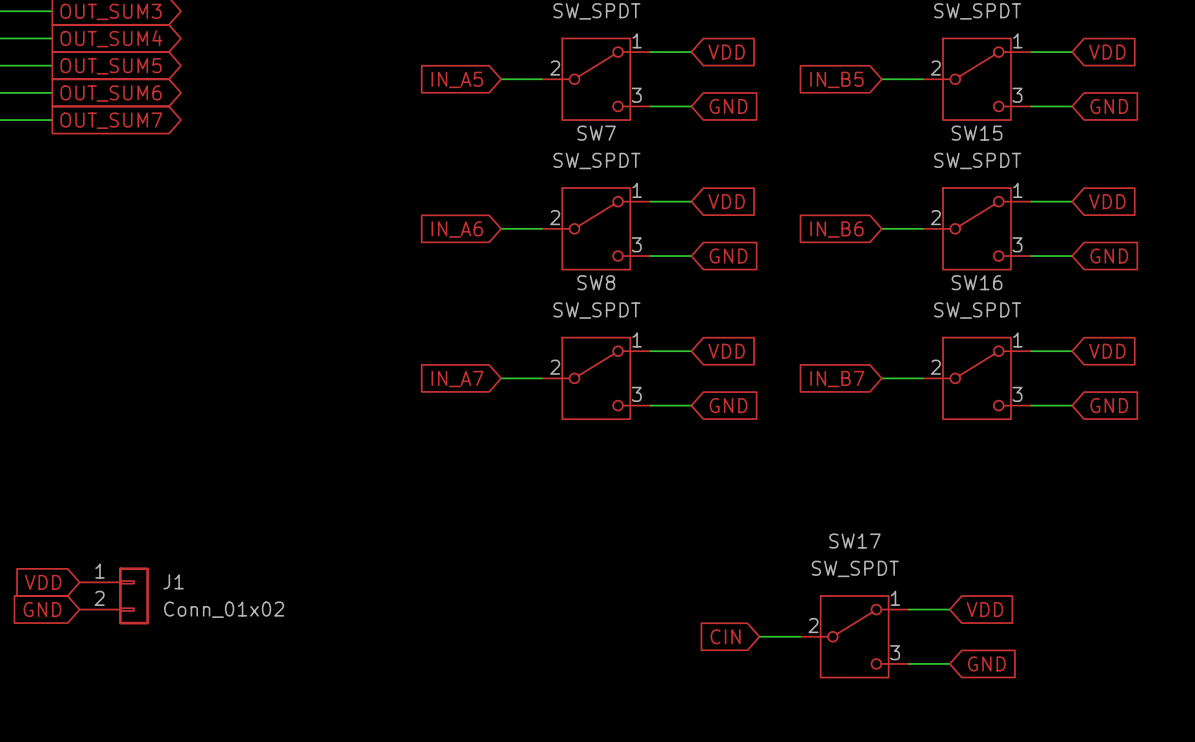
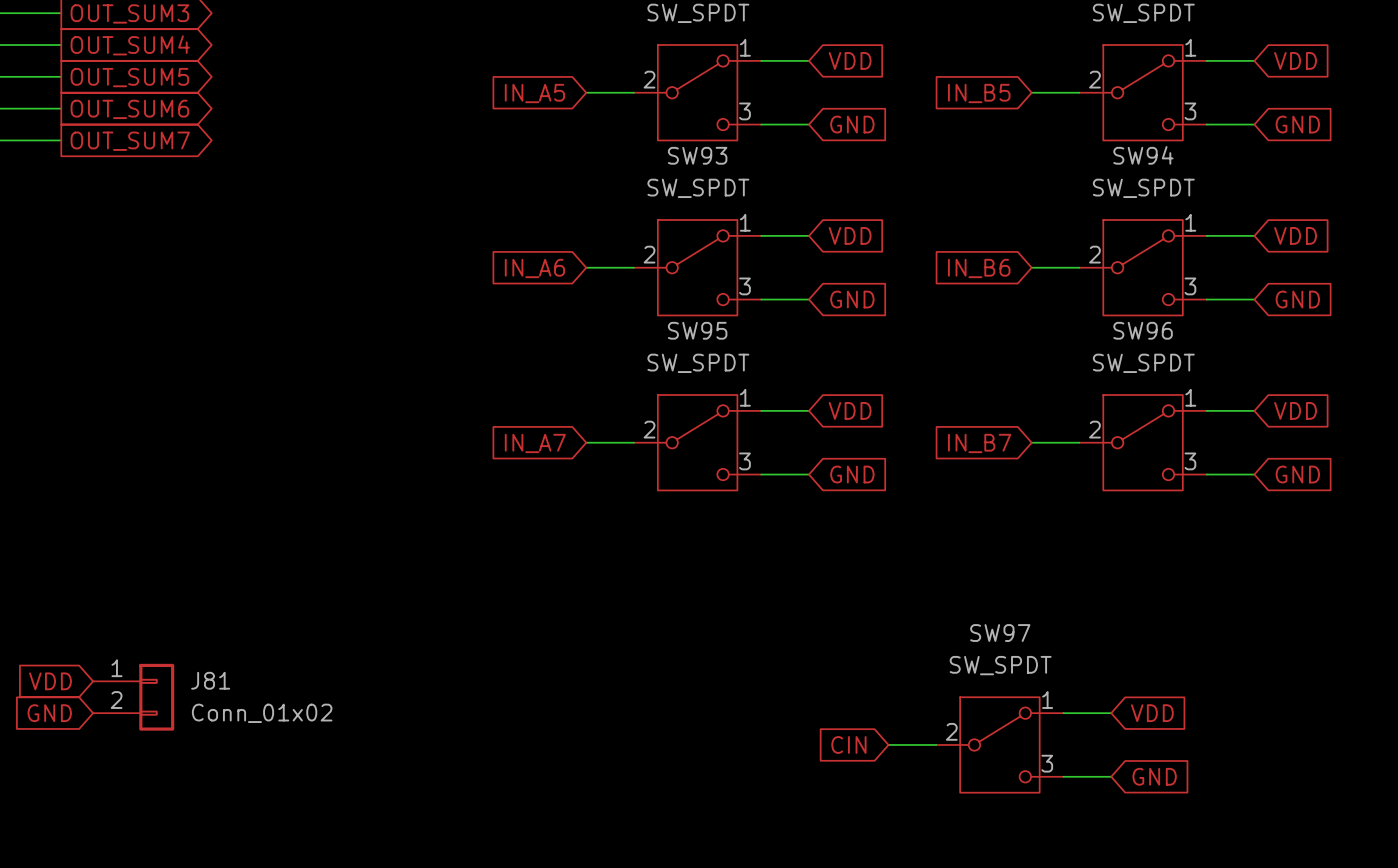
SW7 name: SW7 (596, 133) -> SW93 (697, 155)
SW15 name: SW15 (977, 133) -> SW94 (1143, 155)
SW8 name: SW8 (596, 282) -> SW95 (697, 330)
SW16 name: SW16 (977, 282) -> SW96 (1143, 330)
SW17 name: SW17 (854, 541) -> SW97 (1000, 633)
J1 name: J1 (173, 581) -> J81 (210, 680)

